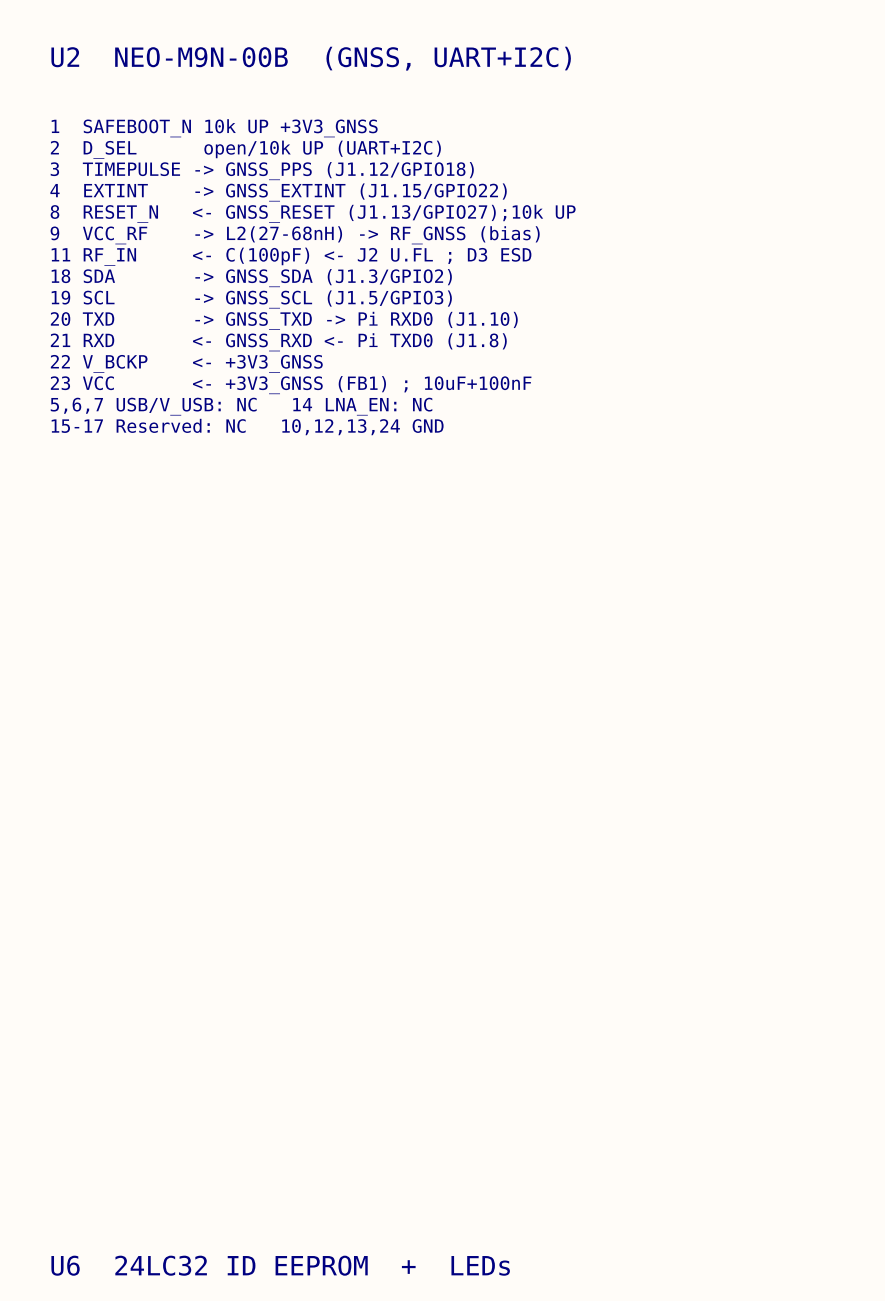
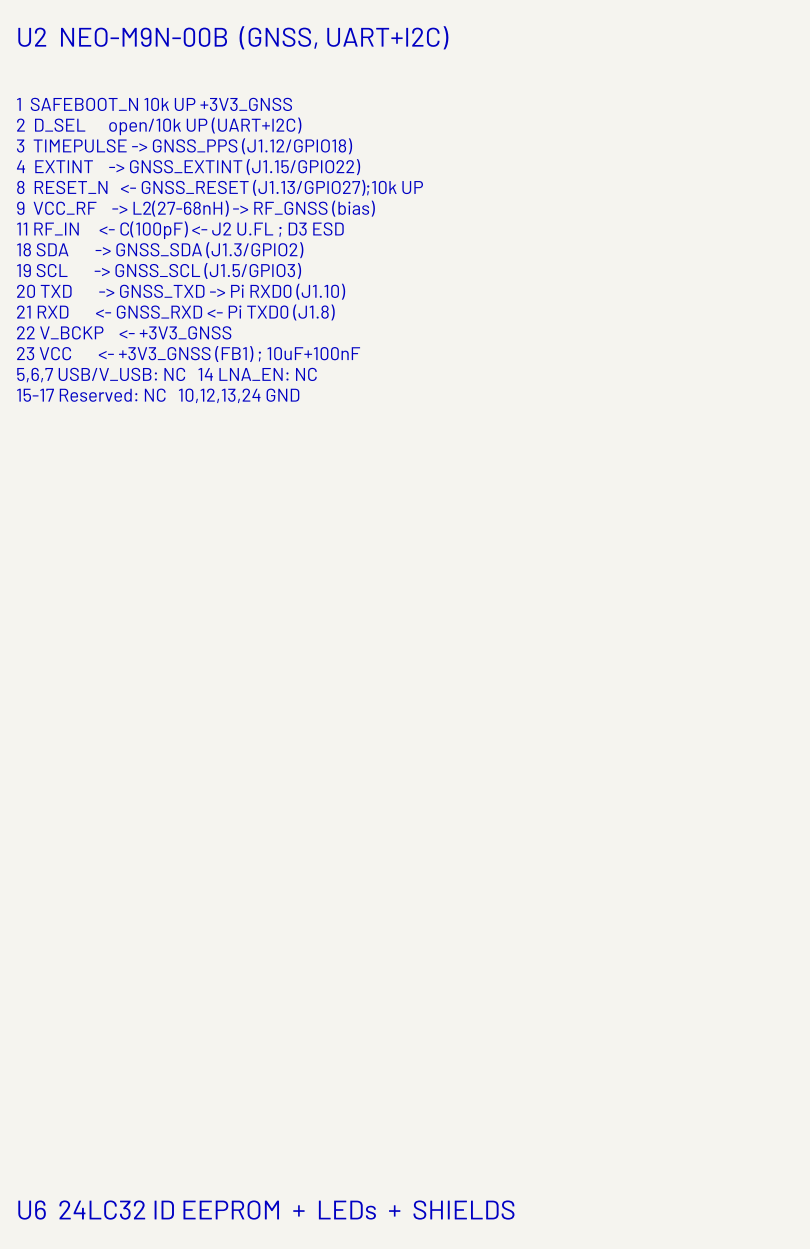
text: U6 24LC32 ID EEPROM + LEDs (280, 1265) -> U6 24LC32 ID EEPROM + LEDs + SHIELDS (266, 1210)

